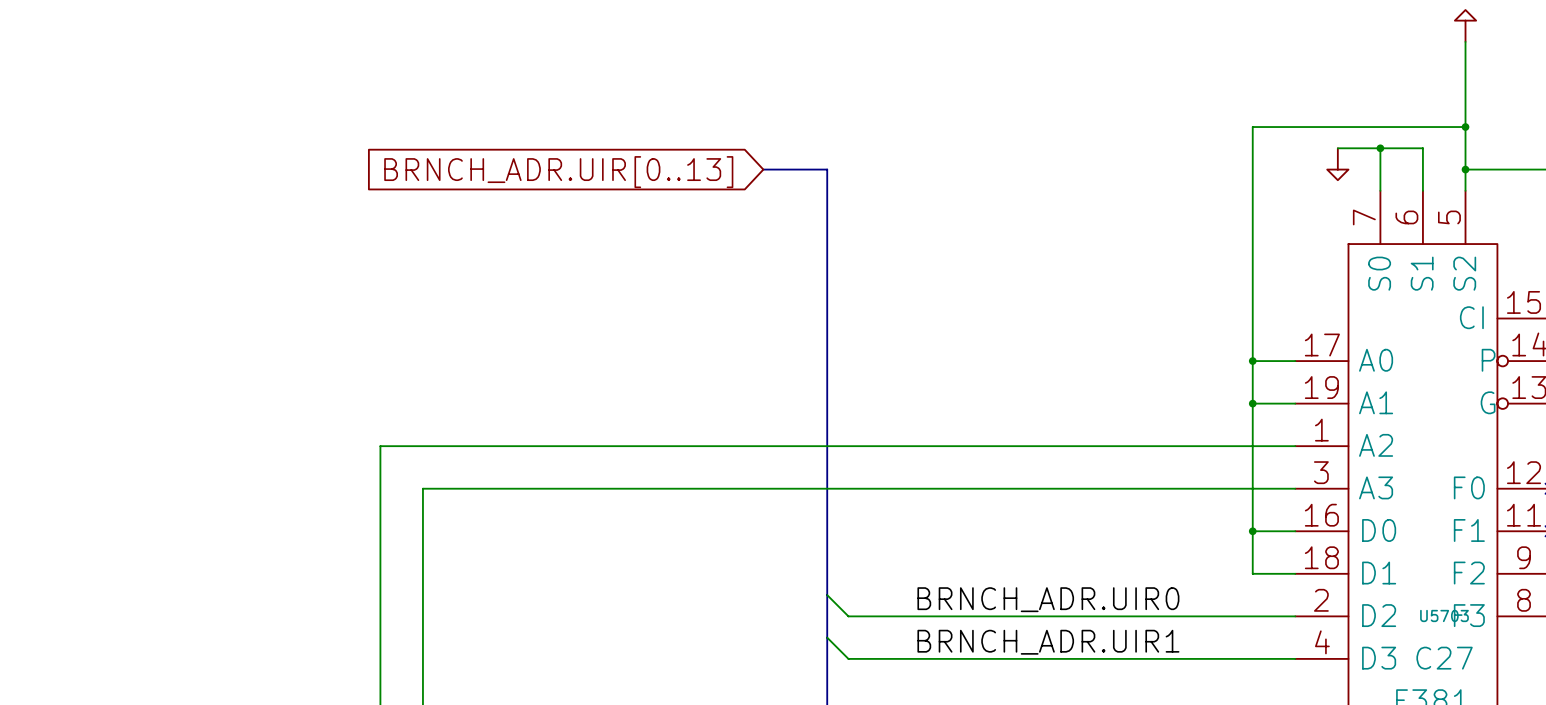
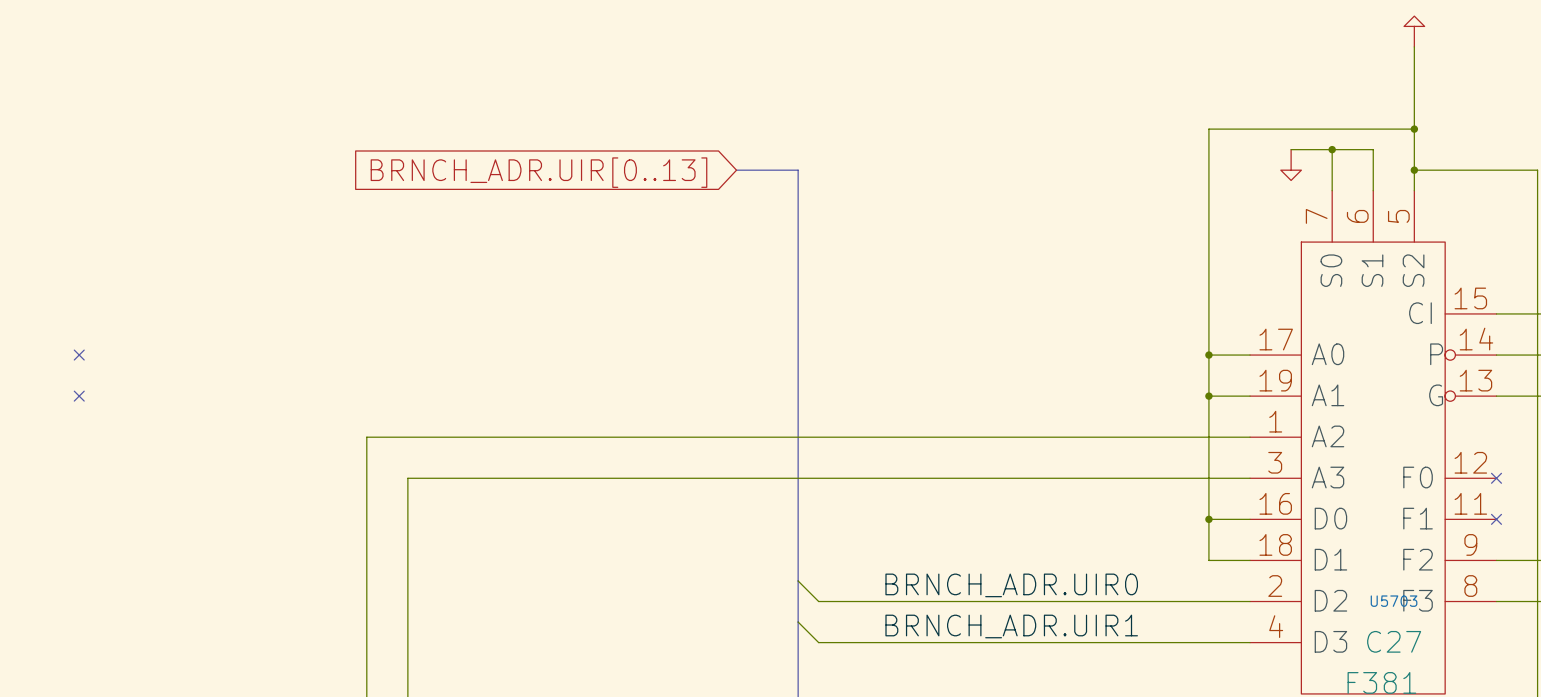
no-connect mark: none -> (79, 355)
no-connect mark: none -> (79, 396)

